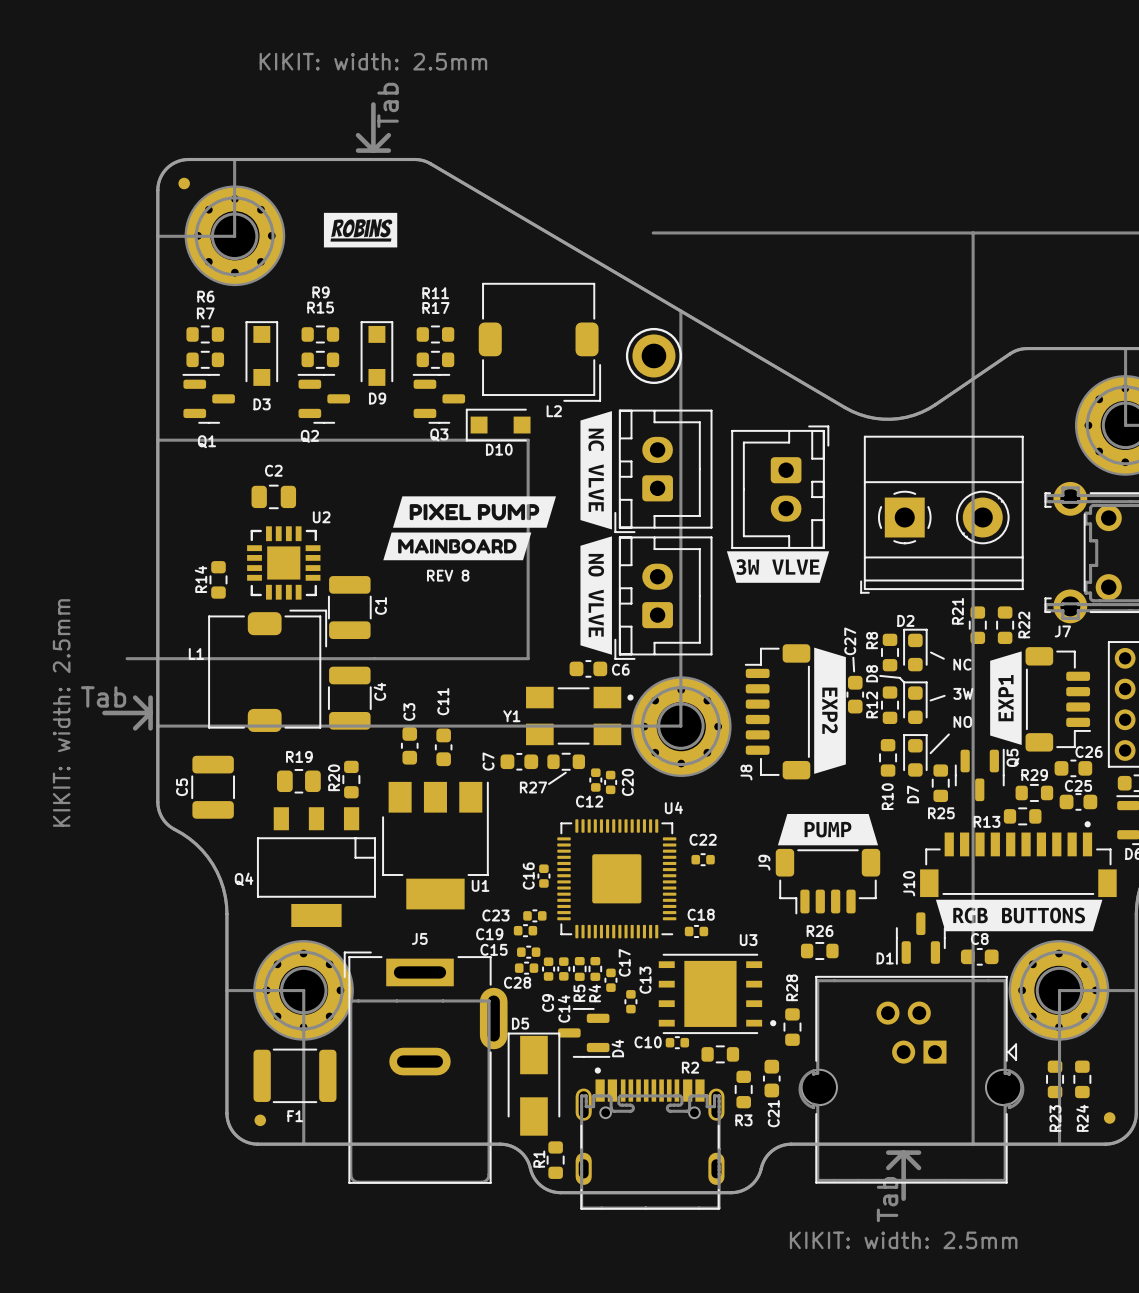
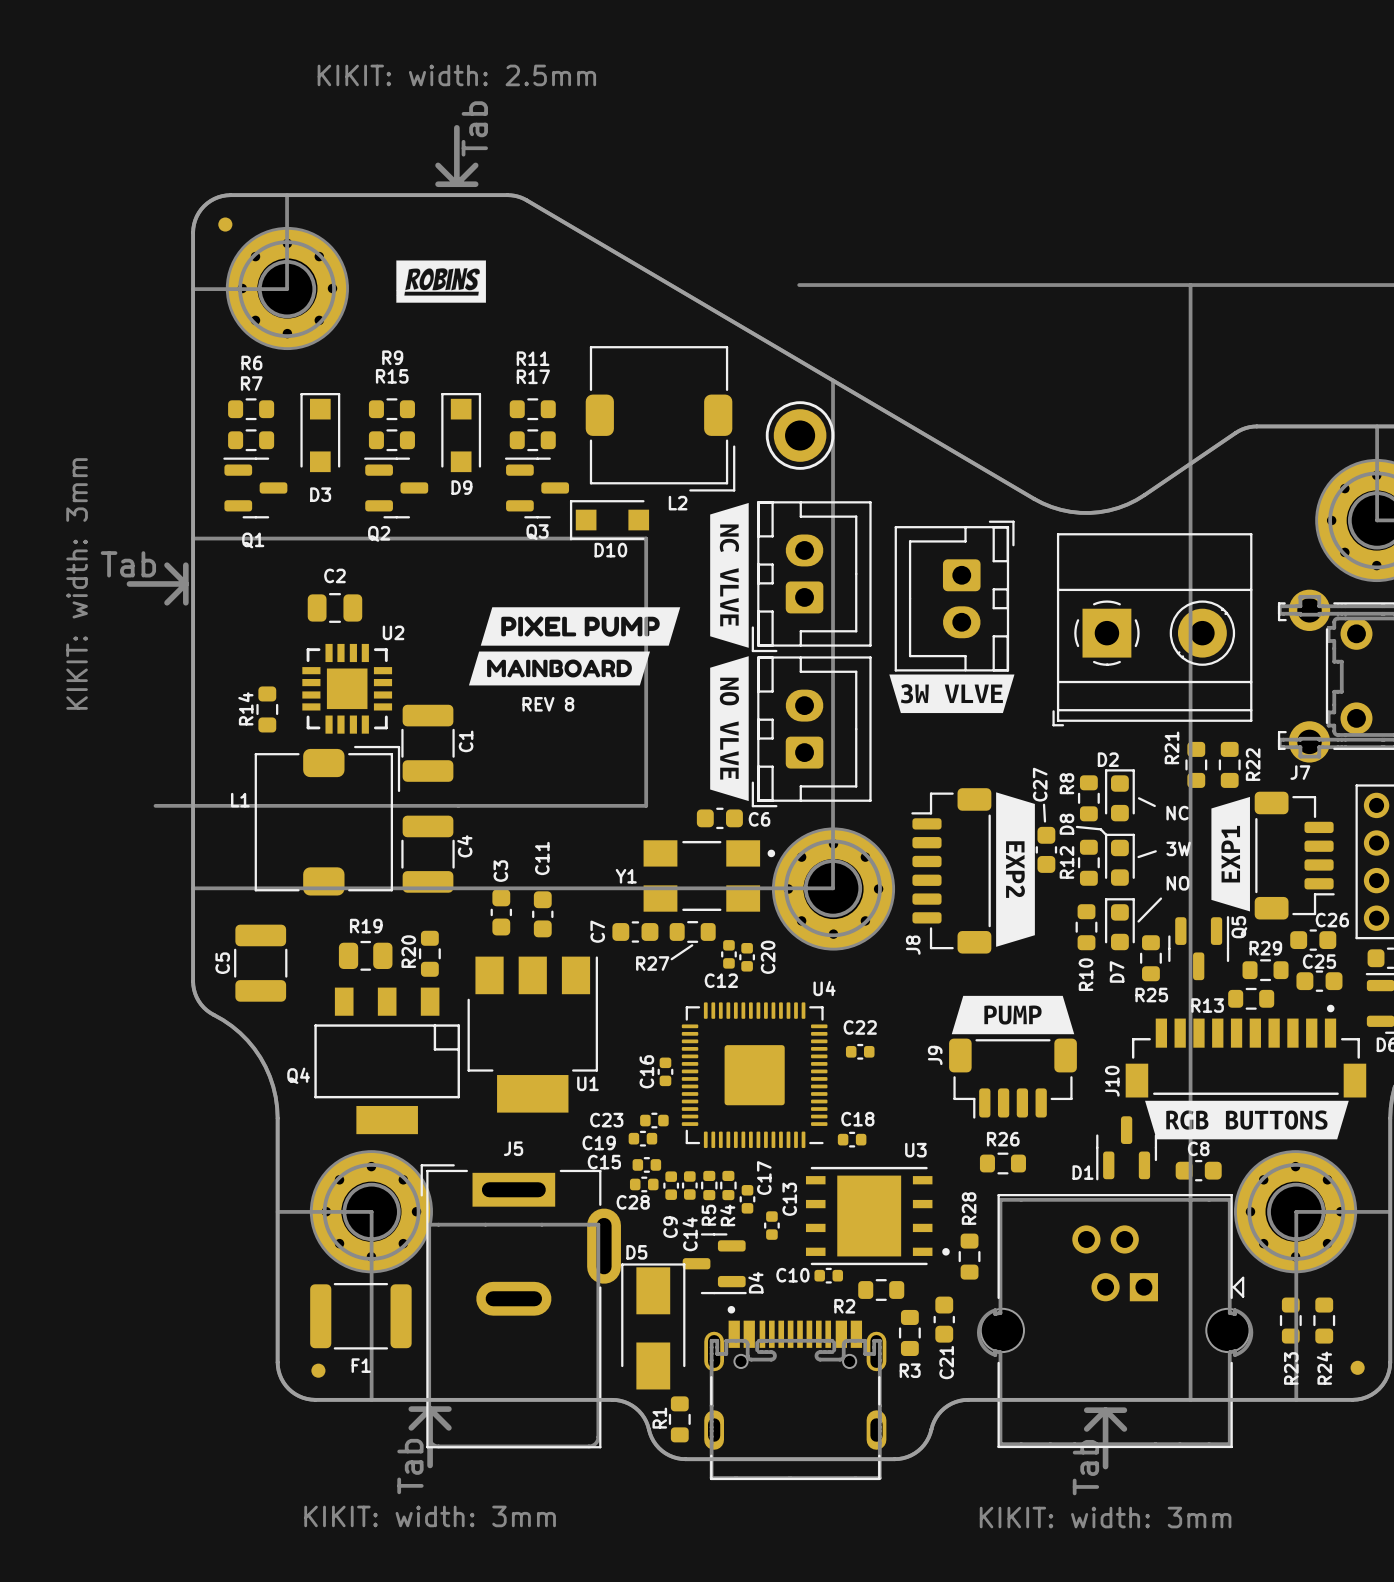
drawing: none -> [126, 562, 189, 606]
drawing: [102, 695, 153, 731] -> none
drawing: none -> [408, 1406, 452, 1469]
drawing shape: [789, 1150, 1018, 1250] -> [979, 1407, 1232, 1529]

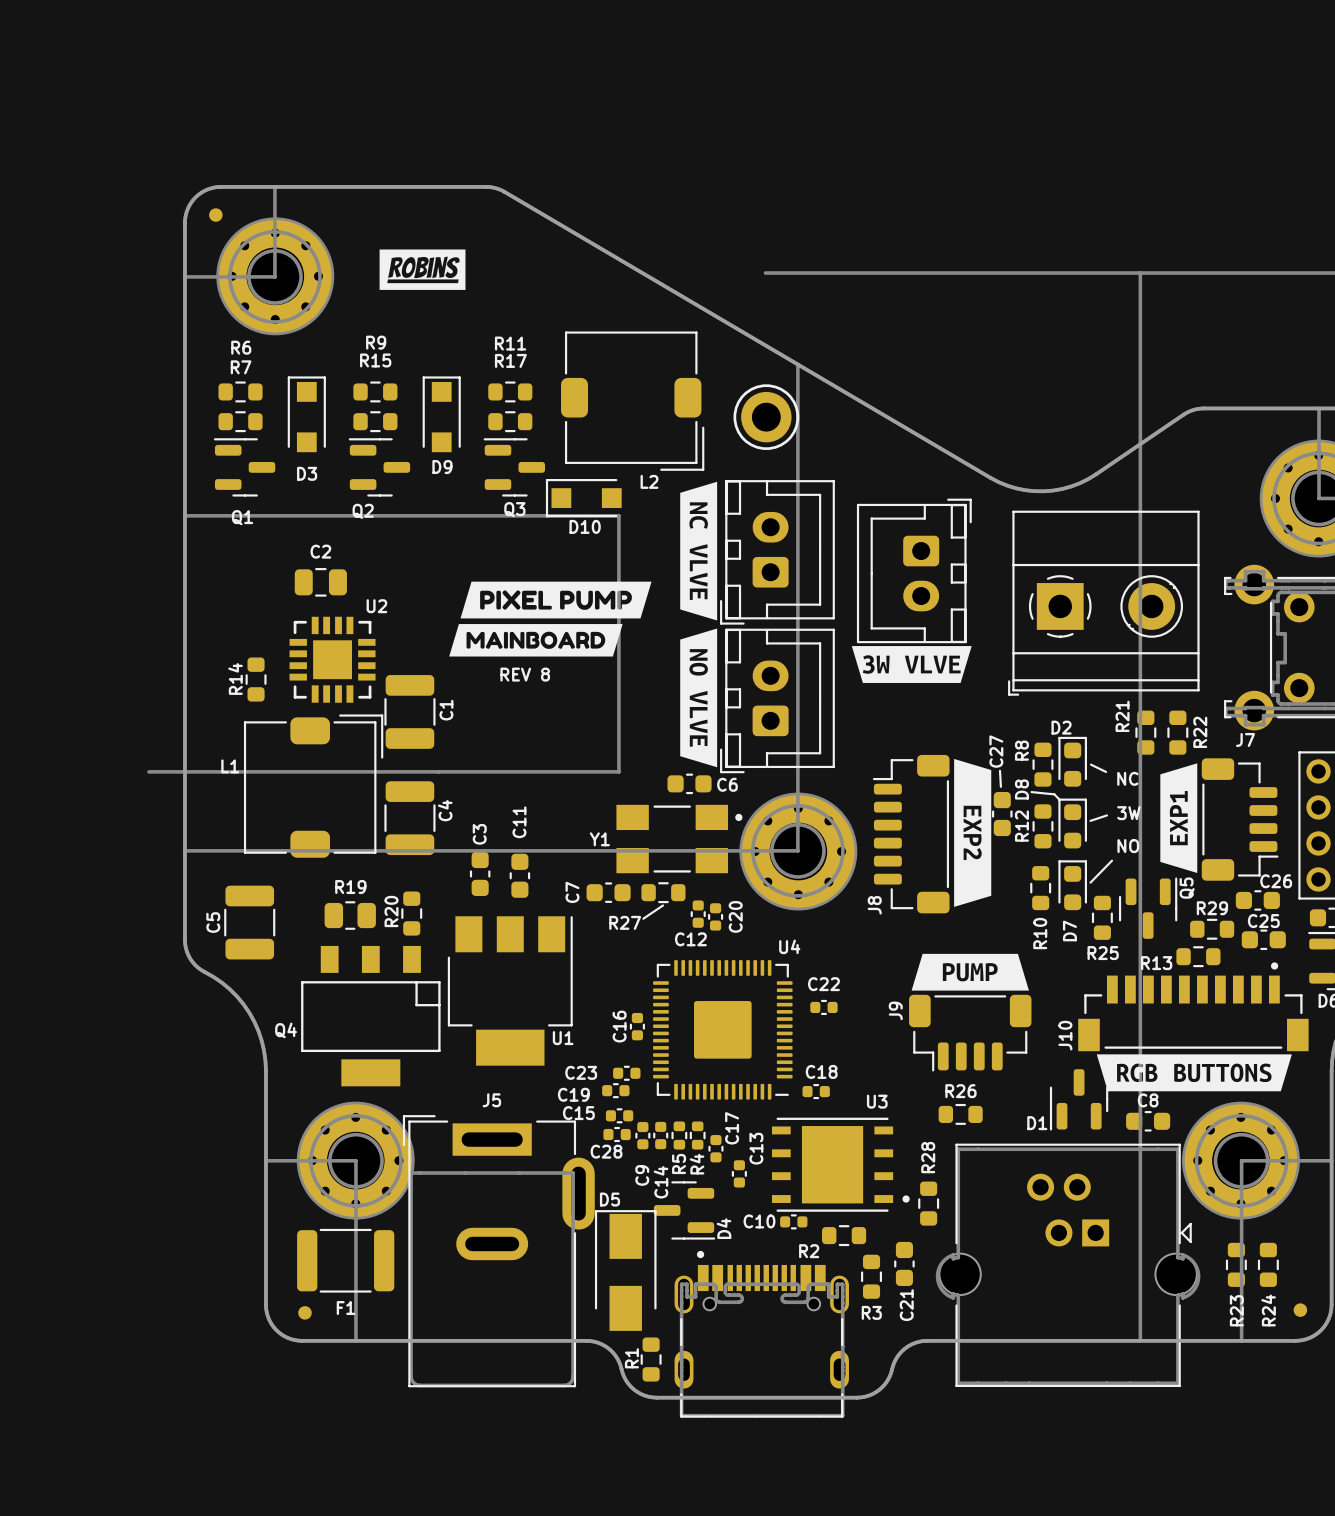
drawing: [435, 125, 479, 188] -> none
drawing: [126, 562, 189, 606] -> none
drawing: [408, 1406, 452, 1469] -> none
drawing: [1083, 1407, 1128, 1470] -> none

